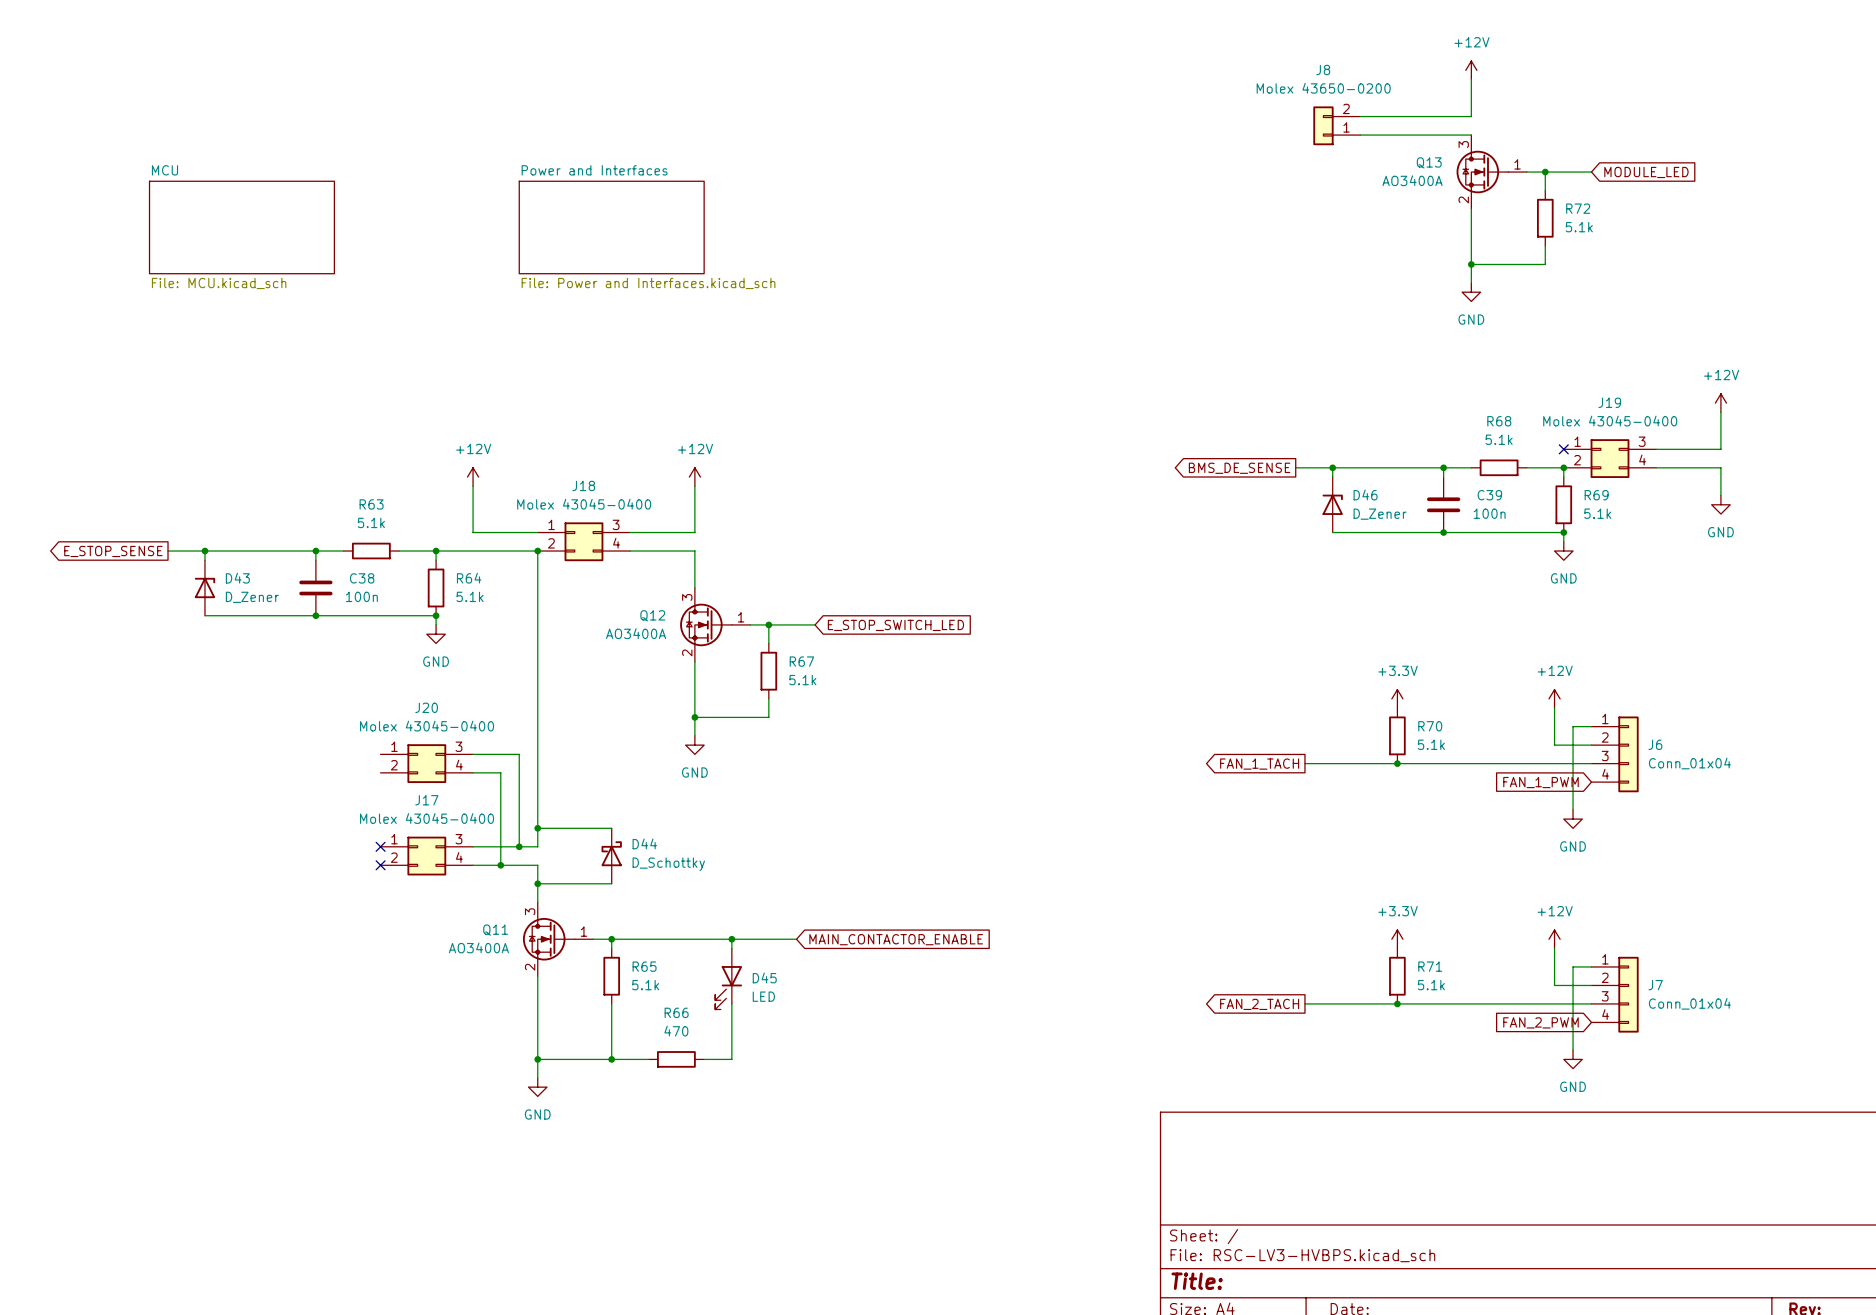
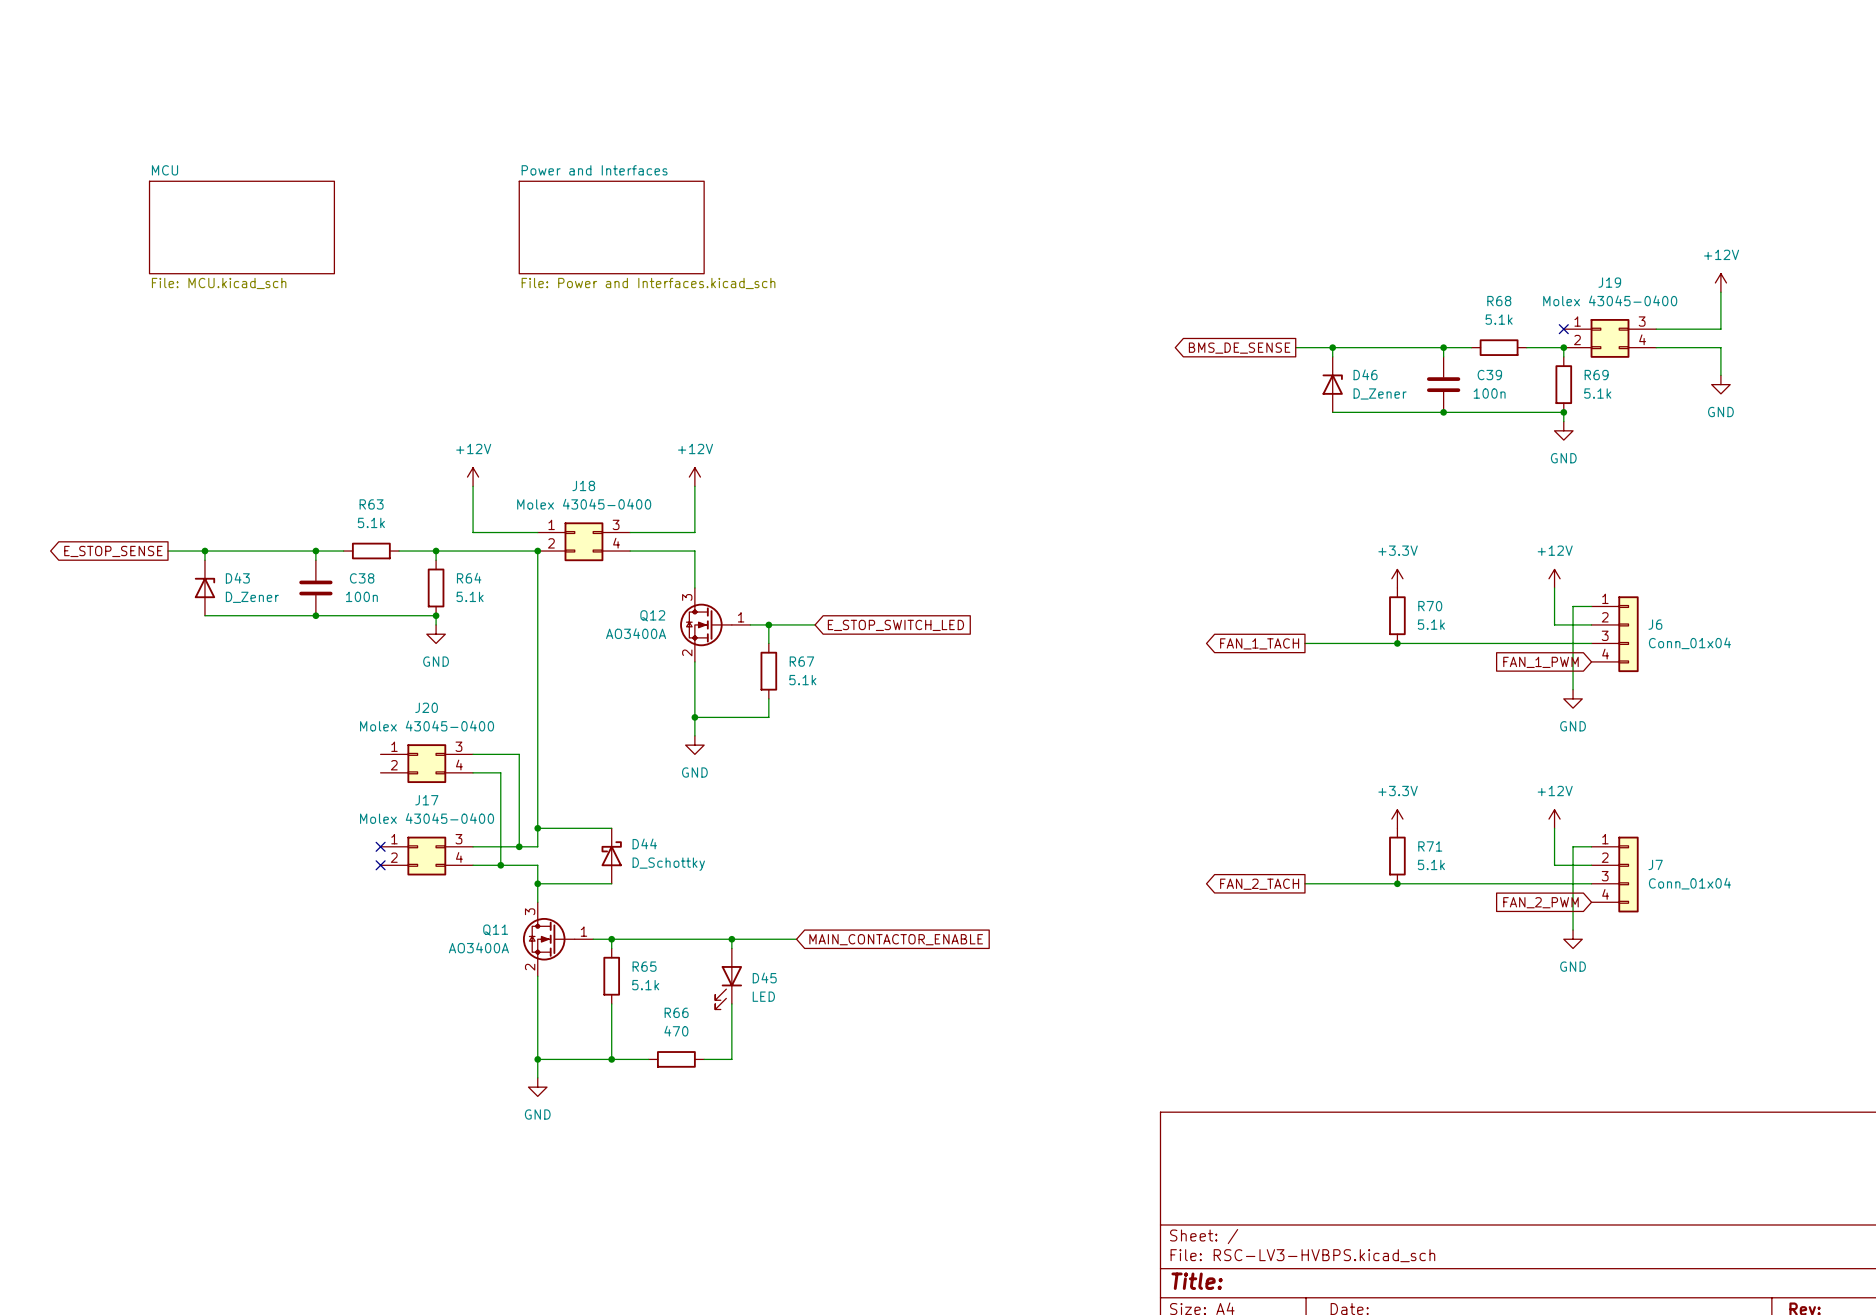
power symbol: +12V (1471, 70) -> none
wire: (1471, 79) (1471, 116) (1360, 116) -> none
J8: Molex 43650-0200 (1336, 125) -> none
wire: (1360, 135) (1471, 135) -> none
Q13: AO3400A (1491, 172) -> none
wire: (1526, 172) (1591, 172) -> none
wire: (1545, 172) (1545, 190) -> none
junction: (1545, 172) -> none
global label: MODULE_LED (1646, 172) -> none
wire: (1471, 209) (1471, 282) -> none
R72: 5.1k (1545, 218) -> none
wire: (1545, 245) (1545, 264) (1471, 264) -> none
junction: (1471, 264) -> none
power symbol: GND (1471, 292) -> none
no-connect mark: none -> (1563, 329)
junction: none -> (1332, 347)
junction: none -> (1443, 347)
junction: none -> (1563, 347)
power symbol: none -> GND (1720, 384)
power symbol position: +12V (1720, 403) -> +12V (1720, 282)
junction: none -> (1443, 412)
junction: none -> (1563, 412)
wire: (1720, 412) (1720, 449) (1656, 449) -> (1720, 292) (1720, 329) (1656, 329)
power symbol: none -> GND (1563, 430)
no-connect mark: (1563, 449) -> none
J19 position: (1610, 458) -> (1610, 338)
wire: (1295, 467) (1471, 467) -> (1295, 347) (1471, 347)
wire: (1332, 467) (1332, 477) -> (1332, 347) (1332, 356)
junction: (1332, 467) -> none
wire: (1443, 467) (1443, 477) -> (1443, 347) (1443, 356)
junction: (1443, 467) -> none
R68 position: (1499, 467) -> (1499, 347)
wire: (1526, 467) (1563, 467) (1563, 477) -> (1526, 347) (1563, 347) (1563, 356)
junction: (1563, 467) -> none
wire: (1656, 467) (1720, 467) (1720, 495) -> (1656, 347) (1720, 347) (1720, 375)
global label position: BMS_DE_SENSE (1239, 468) -> BMS_DE_SENSE (1239, 348)
D46 position: (1332, 504) -> (1332, 384)
C39 position: (1443, 504) -> (1443, 384)
R69 position: (1563, 504) -> (1563, 384)
power symbol: GND (1720, 504) -> none
wire: (1332, 532) (1563, 532) (1563, 541) -> (1332, 412) (1563, 412) (1563, 421)
junction: (1443, 532) -> none
junction: (1563, 532) -> none
power symbol: GND (1563, 551) -> none
power symbol: none -> +3.3V (1397, 578)
power symbol: none -> +12V (1554, 578)
junction: none -> (1397, 643)
power symbol: +3.3V (1397, 698) -> none
power symbol: +12V (1554, 698) -> none
power symbol: none -> GND (1573, 698)
wire: (1554, 708) (1554, 745) (1591, 745) -> (1554, 587) (1554, 624) (1591, 624)
wire: (1591, 726) (1573, 726) (1573, 809) -> (1591, 606) (1573, 606) (1573, 689)
R70 position: (1397, 735) -> (1397, 615)
J6 position: (1615, 754) -> (1615, 634)
wire: (1304, 763) (1591, 763) -> (1304, 643) (1591, 643)
junction: (1397, 763) -> none
global label position: FAN_1_TACH (1259, 764) -> FAN_1_TACH (1259, 643)
global label position: FAN_1_PWM (1540, 782) -> FAN_1_PWM (1540, 662)
power symbol: none -> +3.3V (1397, 819)
power symbol: none -> +12V (1554, 819)
power symbol: GND (1573, 819) -> none
junction: none -> (1397, 883)
power symbol: +3.3V (1397, 939) -> none
power symbol: +12V (1554, 939) -> none
power symbol: none -> GND (1573, 939)
wire: (1554, 948) (1554, 985) (1591, 985) -> (1554, 828) (1554, 865) (1591, 865)
wire: (1591, 966) (1573, 966) (1573, 1050) -> (1591, 846) (1573, 846) (1573, 930)
R71 position: (1397, 976) -> (1397, 856)
J7 position: (1615, 994) -> (1615, 874)
wire: (1304, 1003) (1591, 1003) -> (1304, 883) (1591, 883)
junction: (1397, 1003) -> none
global label position: FAN_2_TACH (1259, 1004) -> FAN_2_TACH (1259, 884)
global label position: FAN_2_PWM (1540, 1022) -> FAN_2_PWM (1540, 902)
power symbol: GND (1573, 1059) -> none

